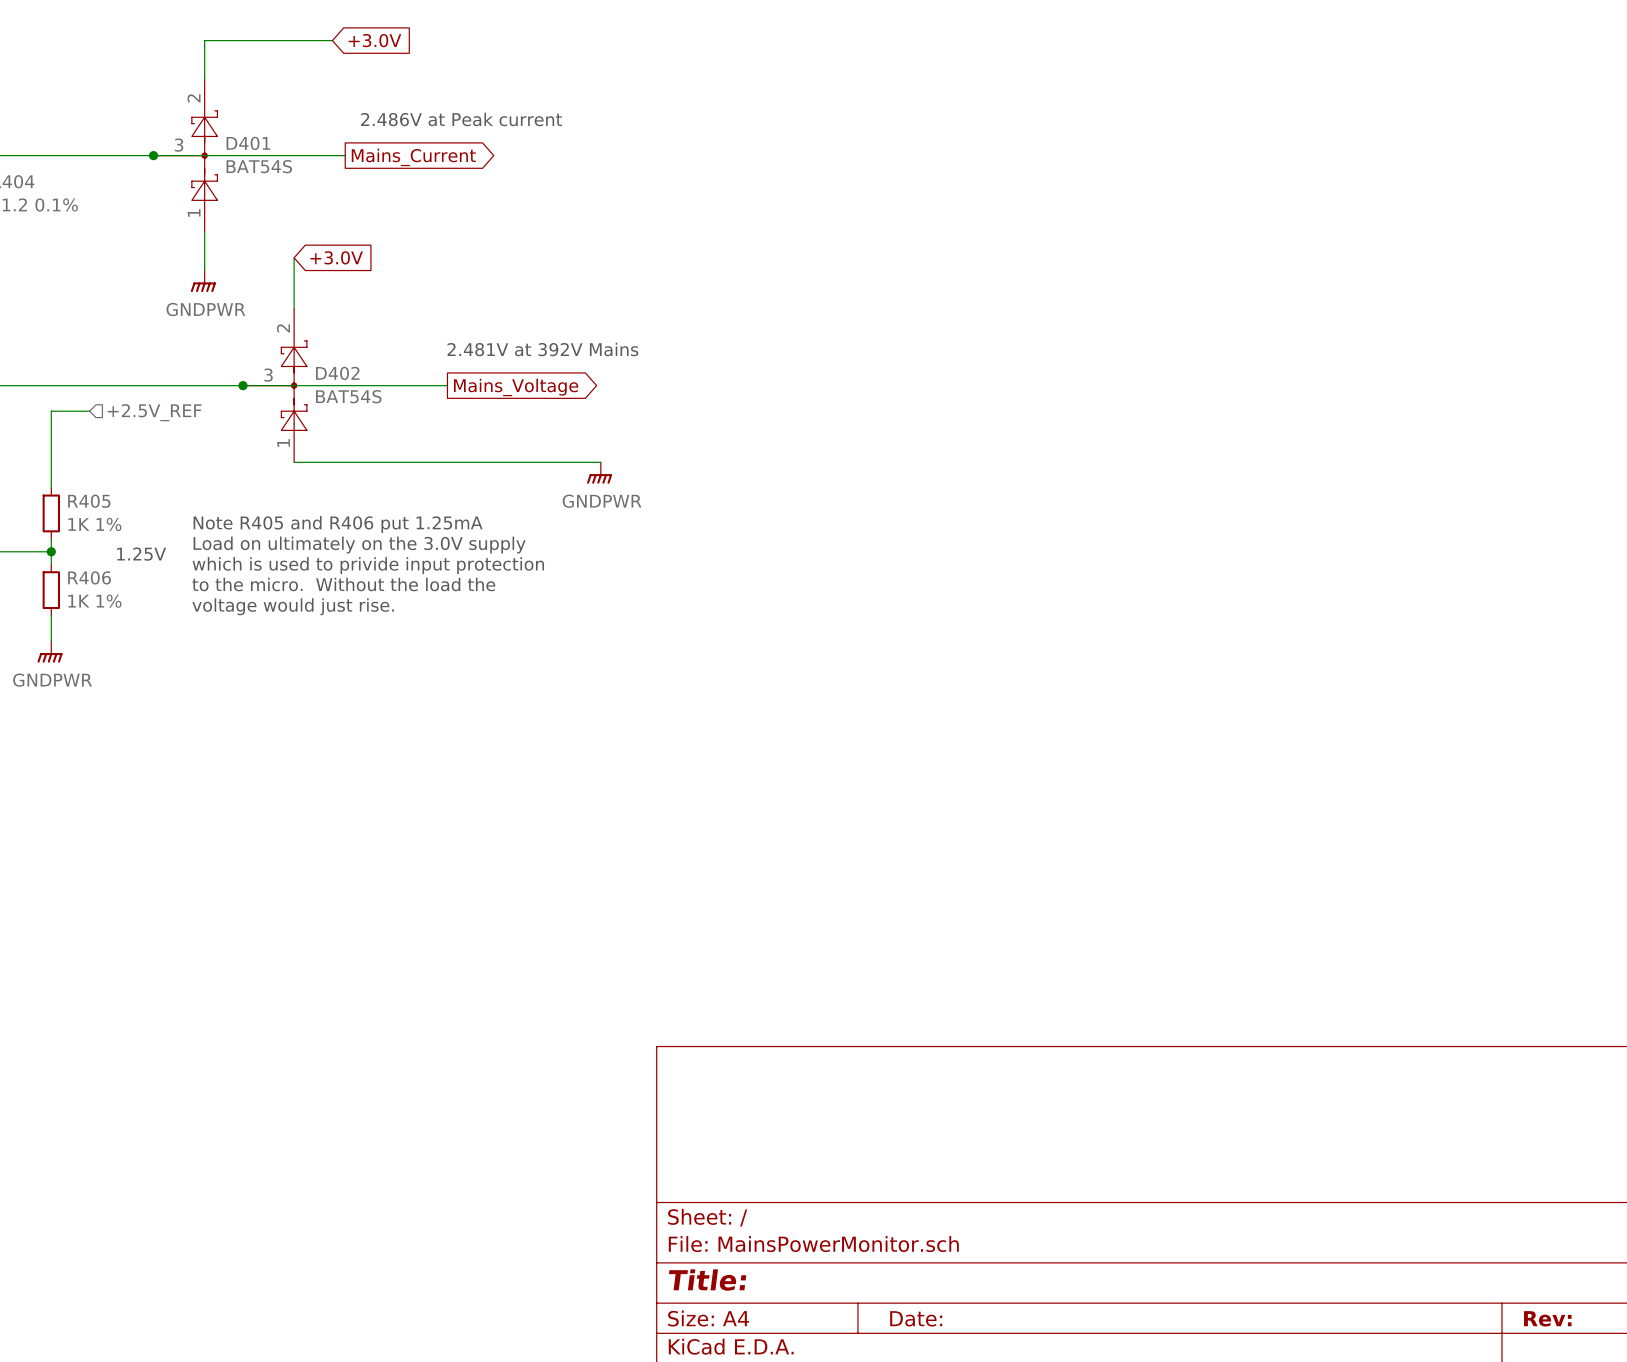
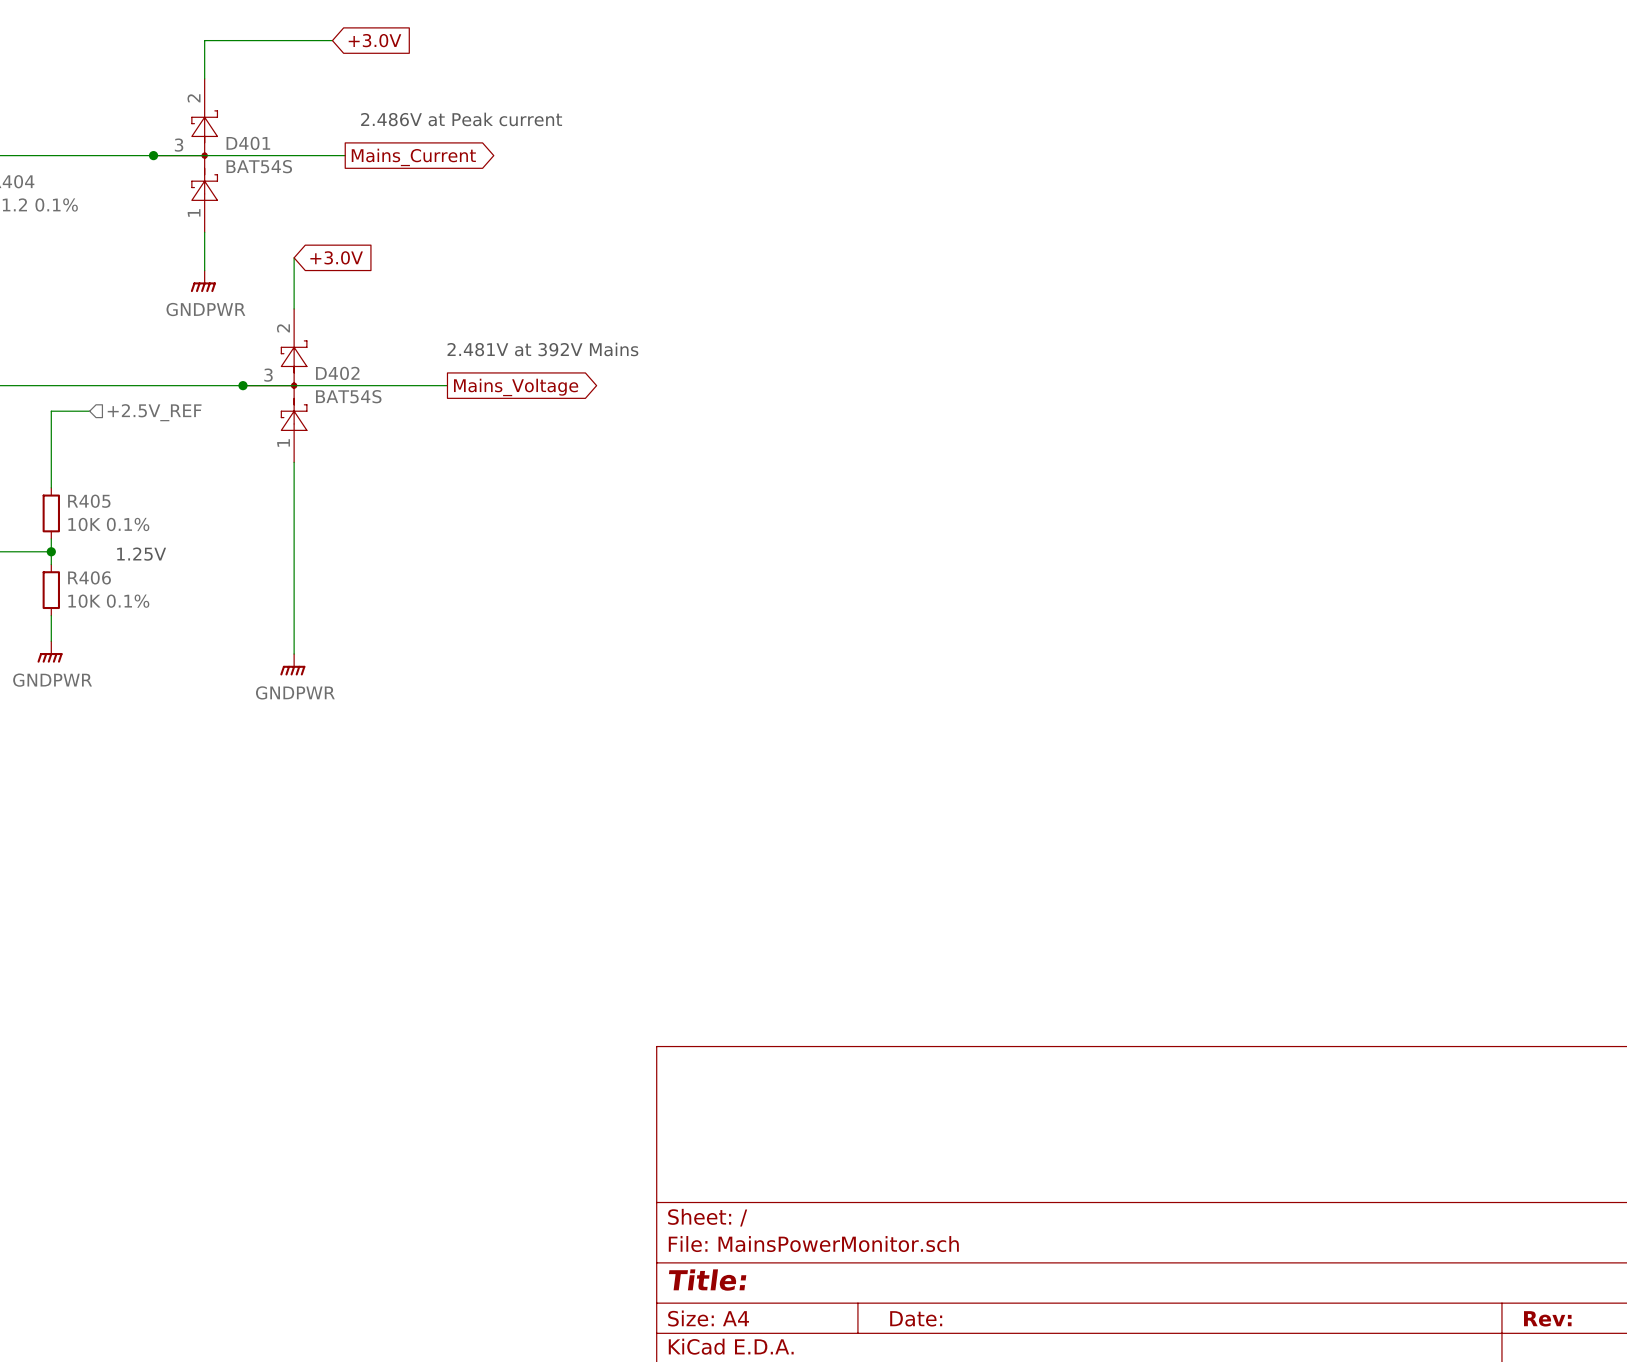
wire: (294, 462) (600, 462) -> (294, 462) (294, 654)
power symbol: GNDPWR (599, 473) -> none
R405 value: 1K 1% (94, 524) -> 10K 0.1% (108, 524)
text: Note R405 and R406 put 1.25mA (338, 524) -> none
text: Load on ultimately on the 3.0V supply (359, 545) -> none
text: which is used to privide input protection (368, 565) -> none
text: to the micro. Without the load the (343, 584) -> none
R406 value: 1K 1% (94, 601) -> 10K 0.1% (108, 601)
text: voltage would just rise. (293, 606) -> none
power symbol: none -> GNDPWR (292, 664)

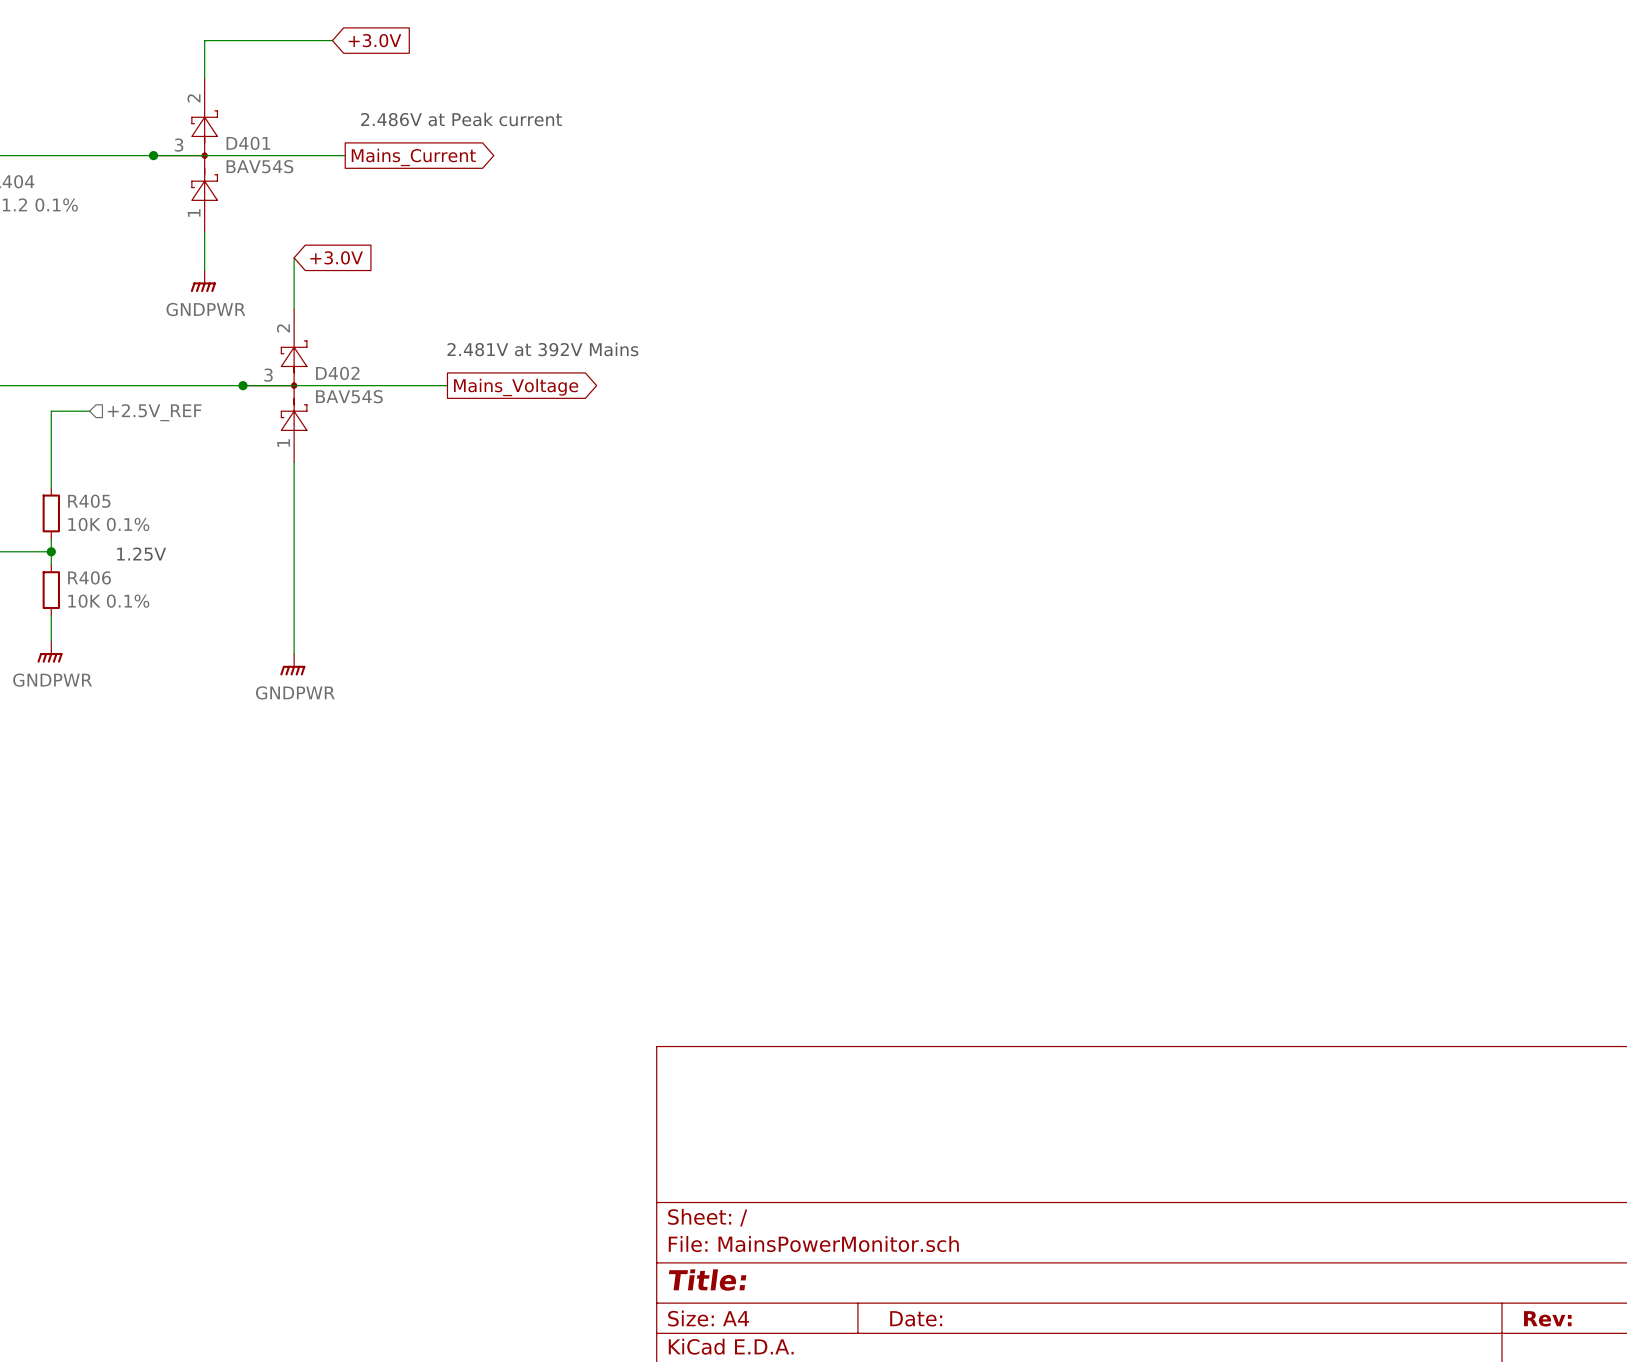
D401 value: BAT54S (259, 166) -> BAV54S (259, 166)
D402 value: BAT54S (348, 396) -> BAV54S (349, 396)

